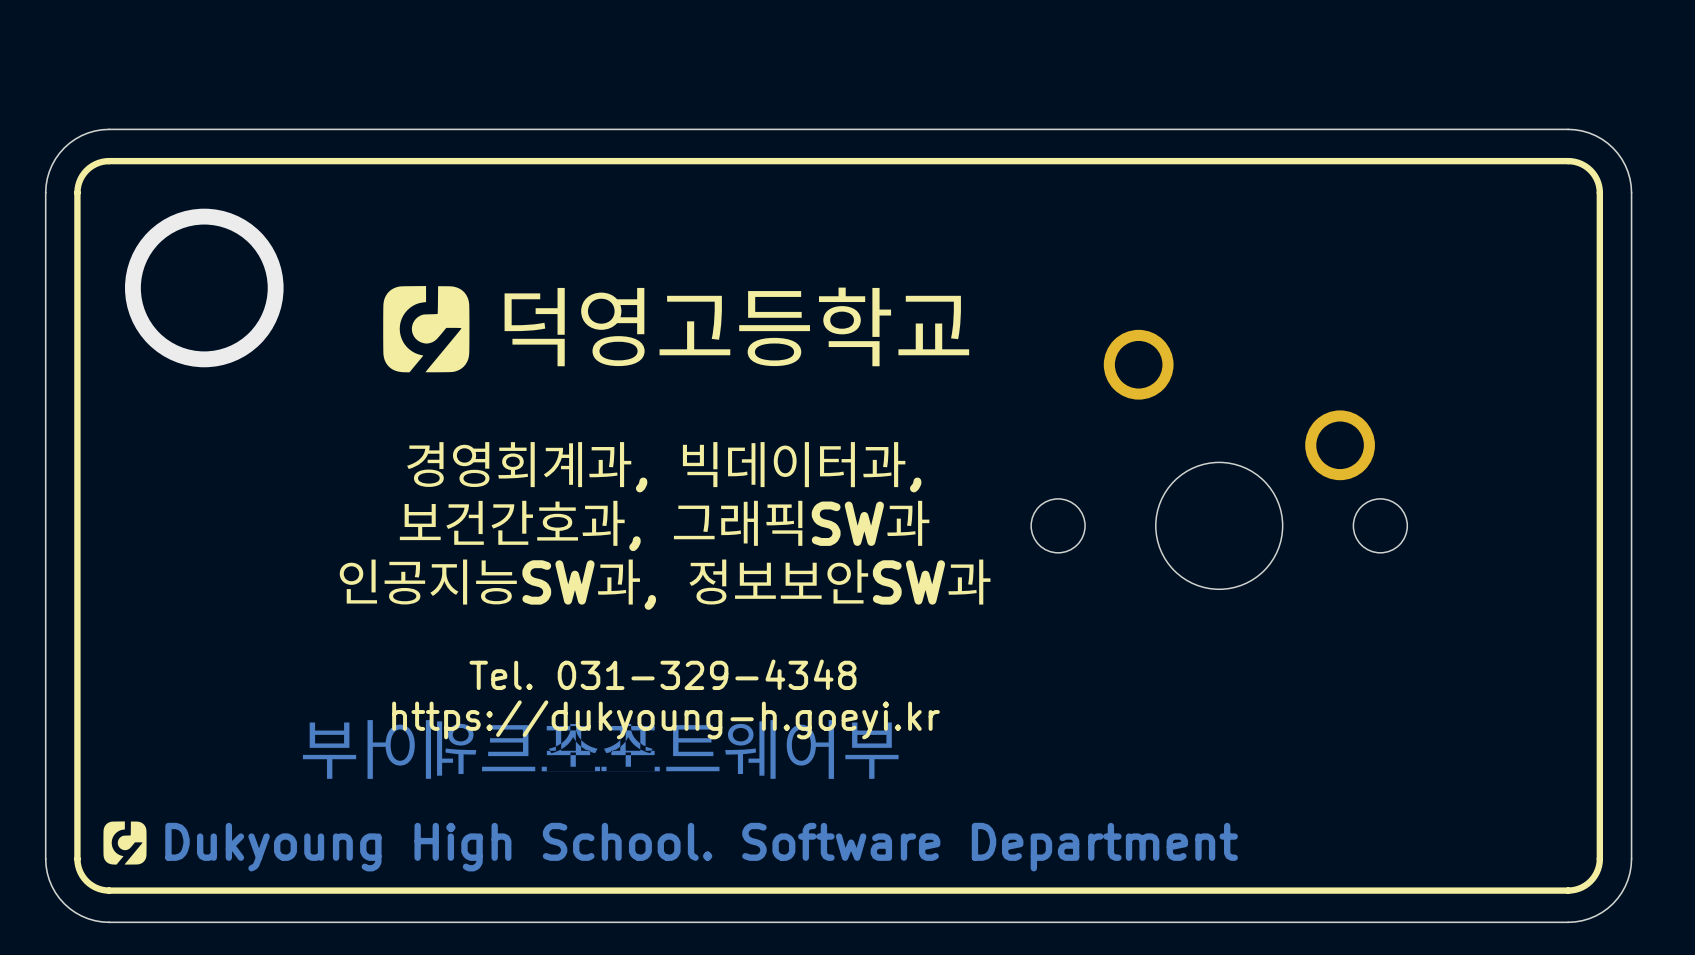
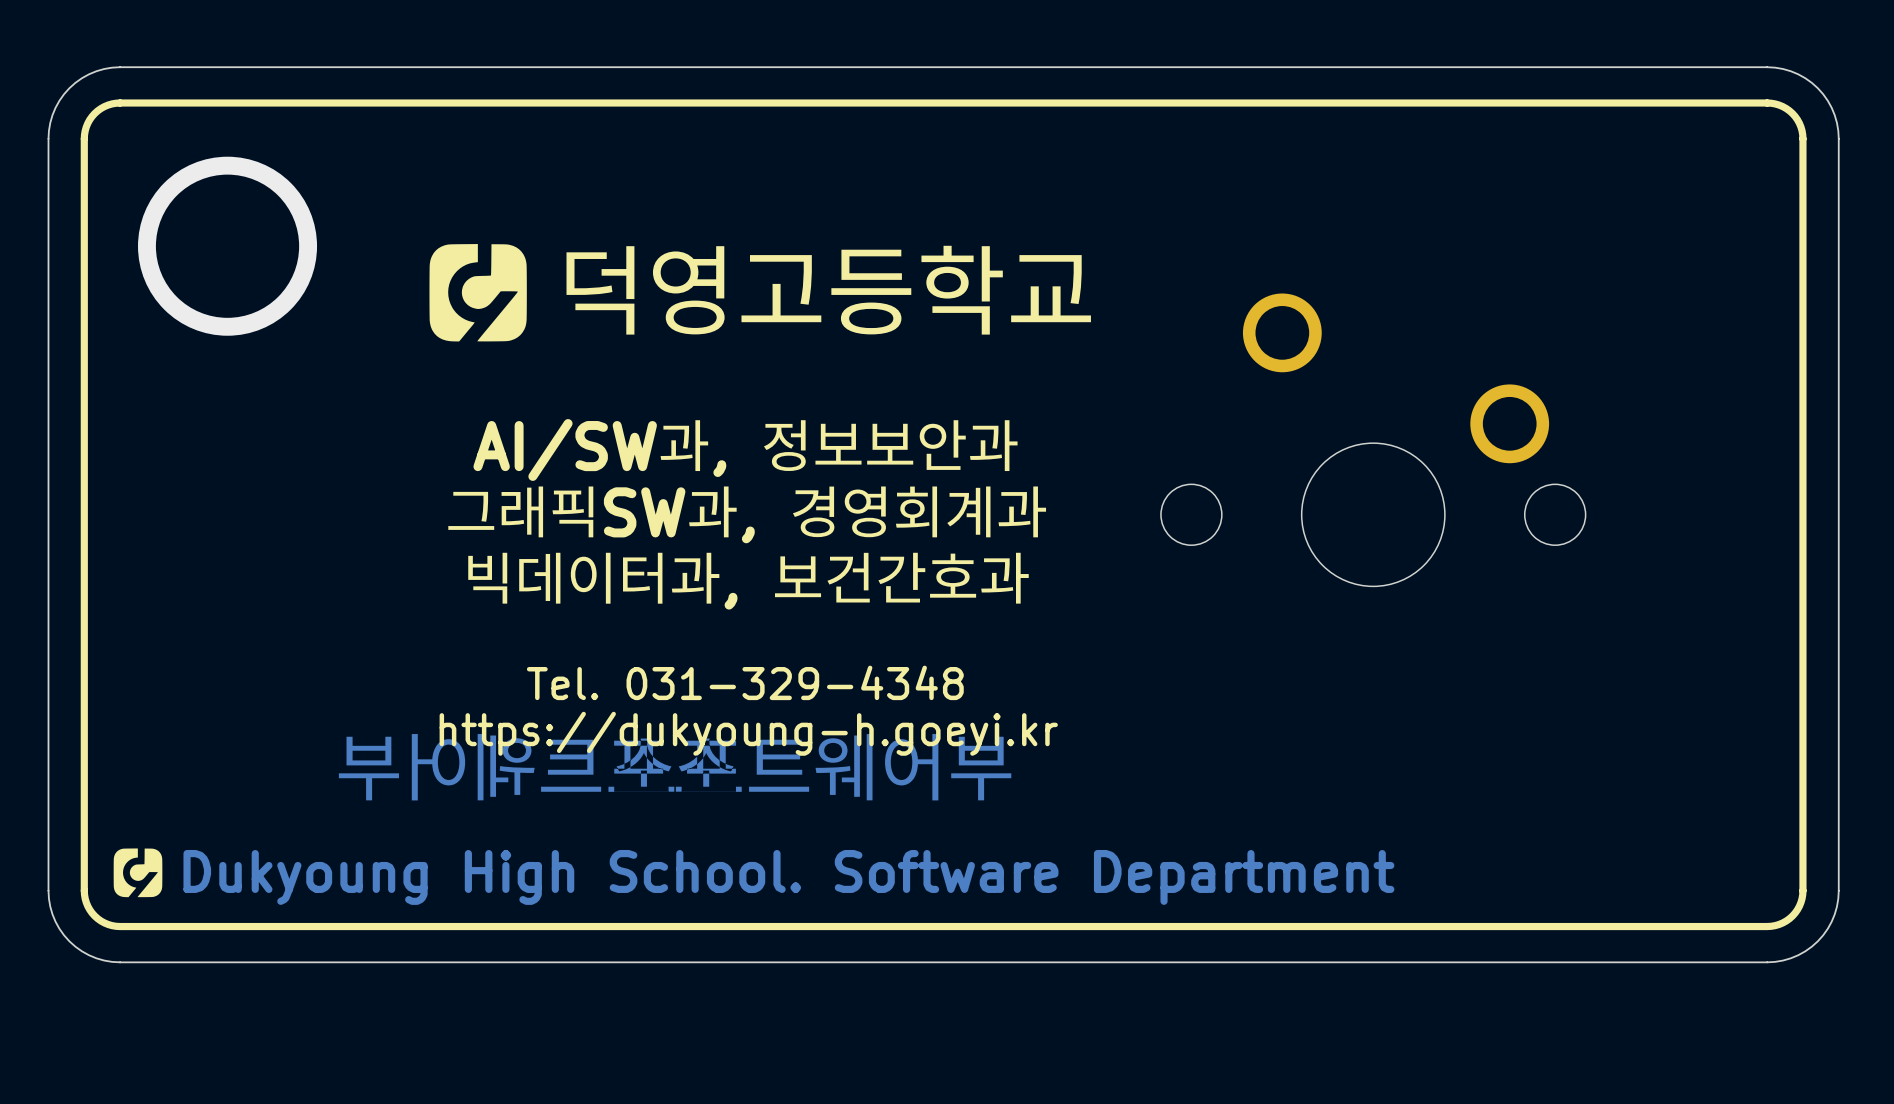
text: 경영회계과, 빅데이터과, (662, 465) -> AI/SW과, 정보보안과 (747, 448)
text: 보건간호과, 그래픽SW과 (664, 523) -> 그래픽SW과, 경영회계과 (747, 512)
text: 인공지능SW과, 정보보안SW과 (665, 582) -> 빅데이터과, 보건간호과 (748, 578)

